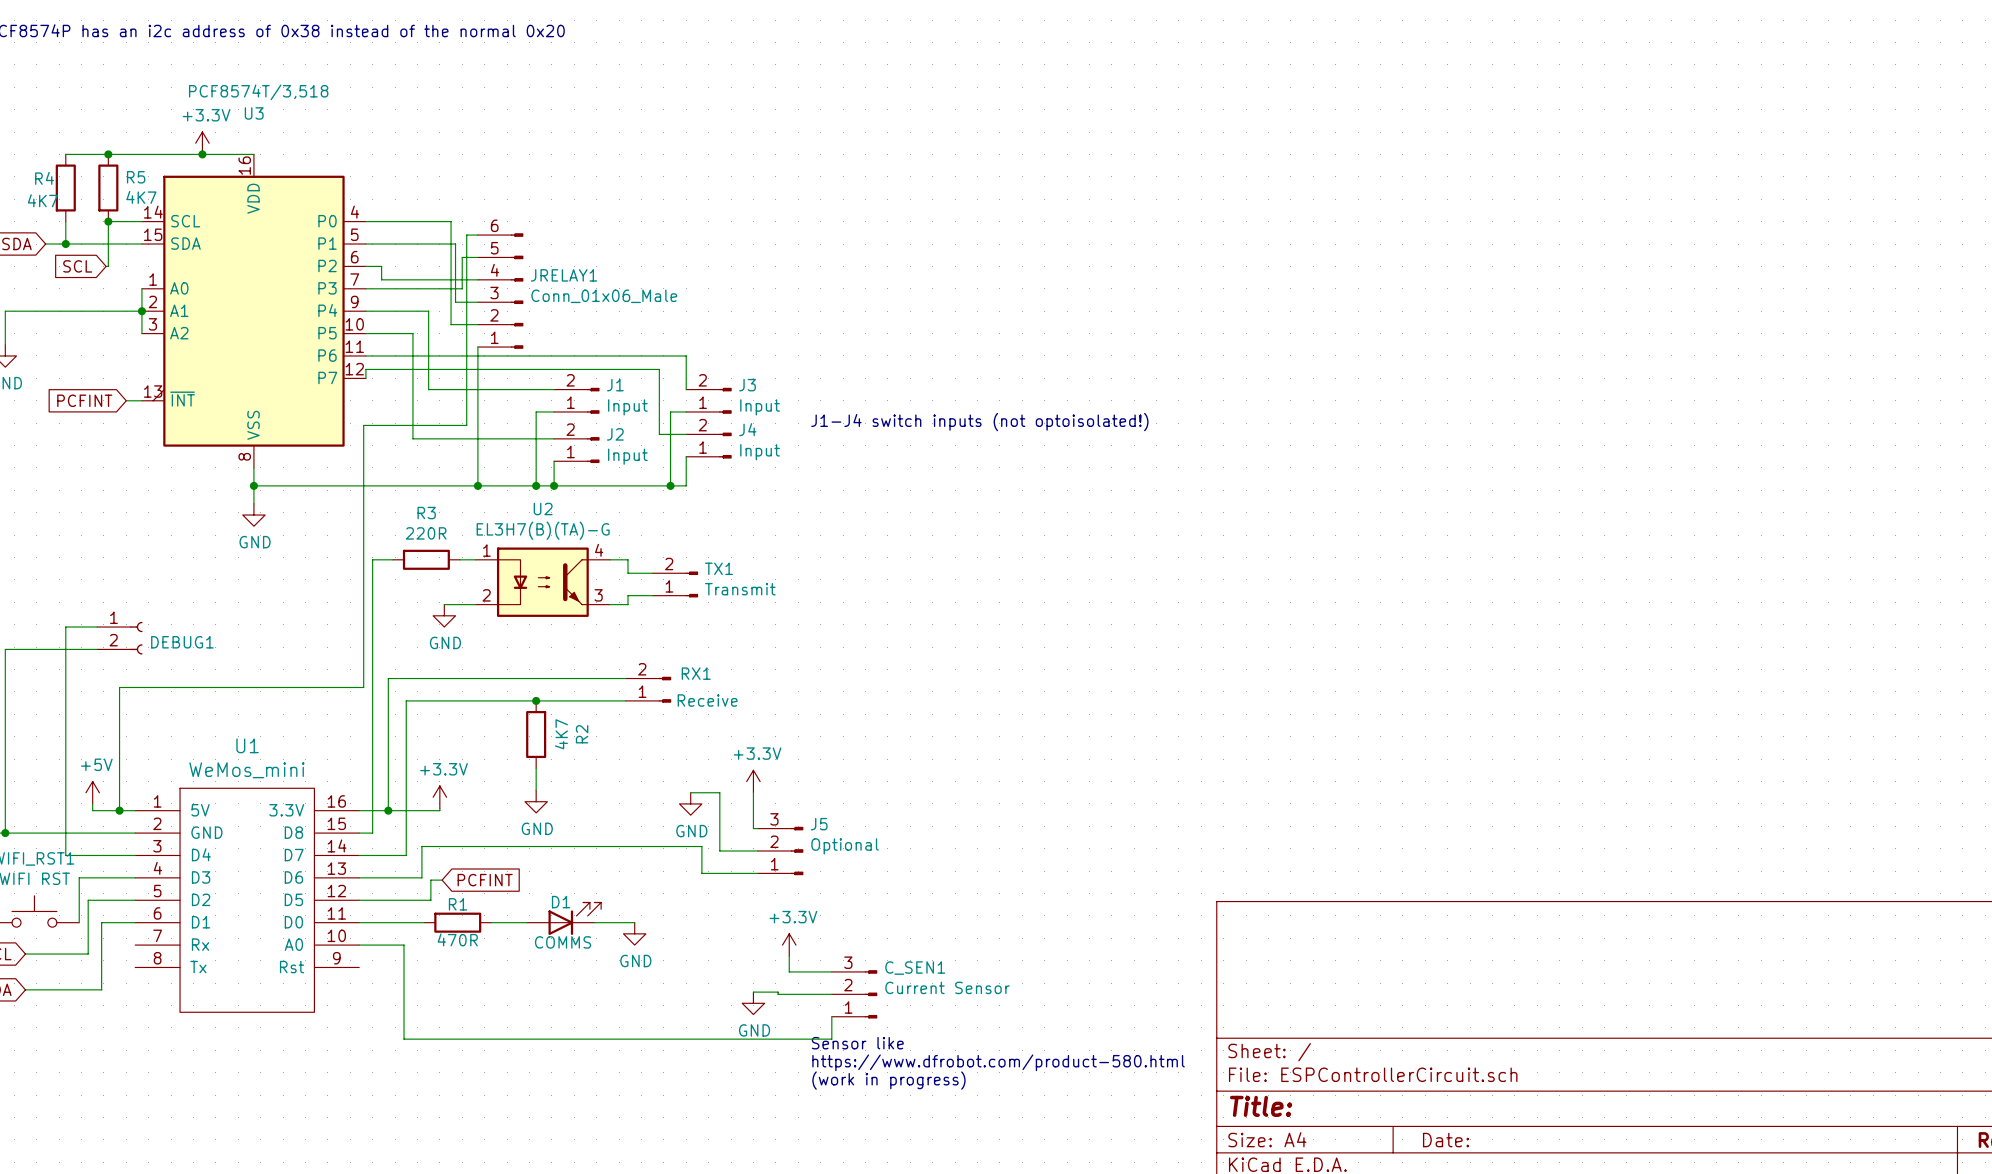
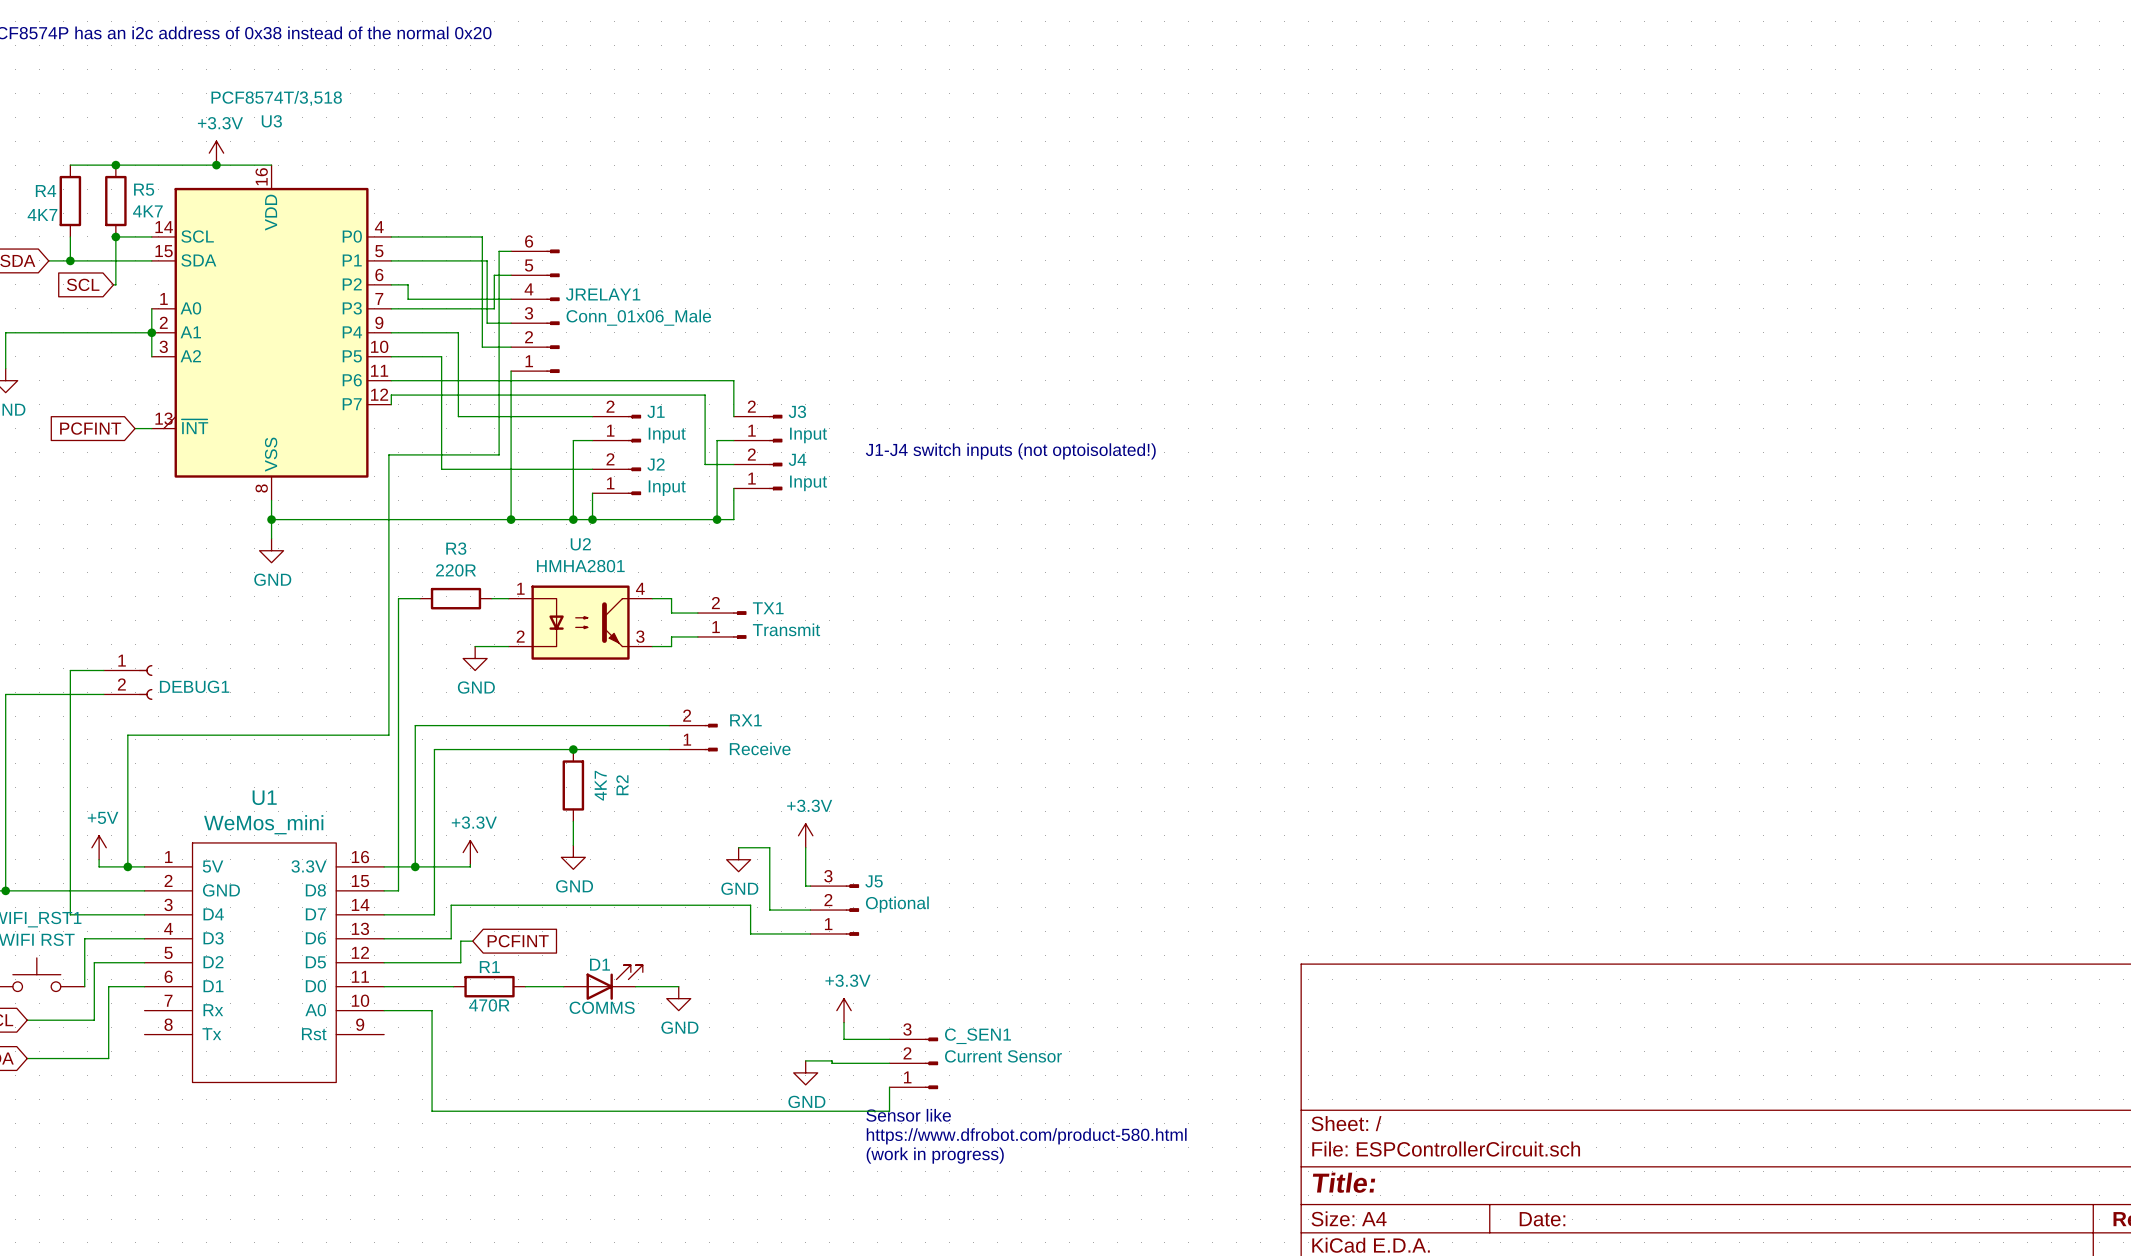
U2 value: EL3H7(B)(TA)-G (543, 530) -> HMHA2801 (580, 566)

